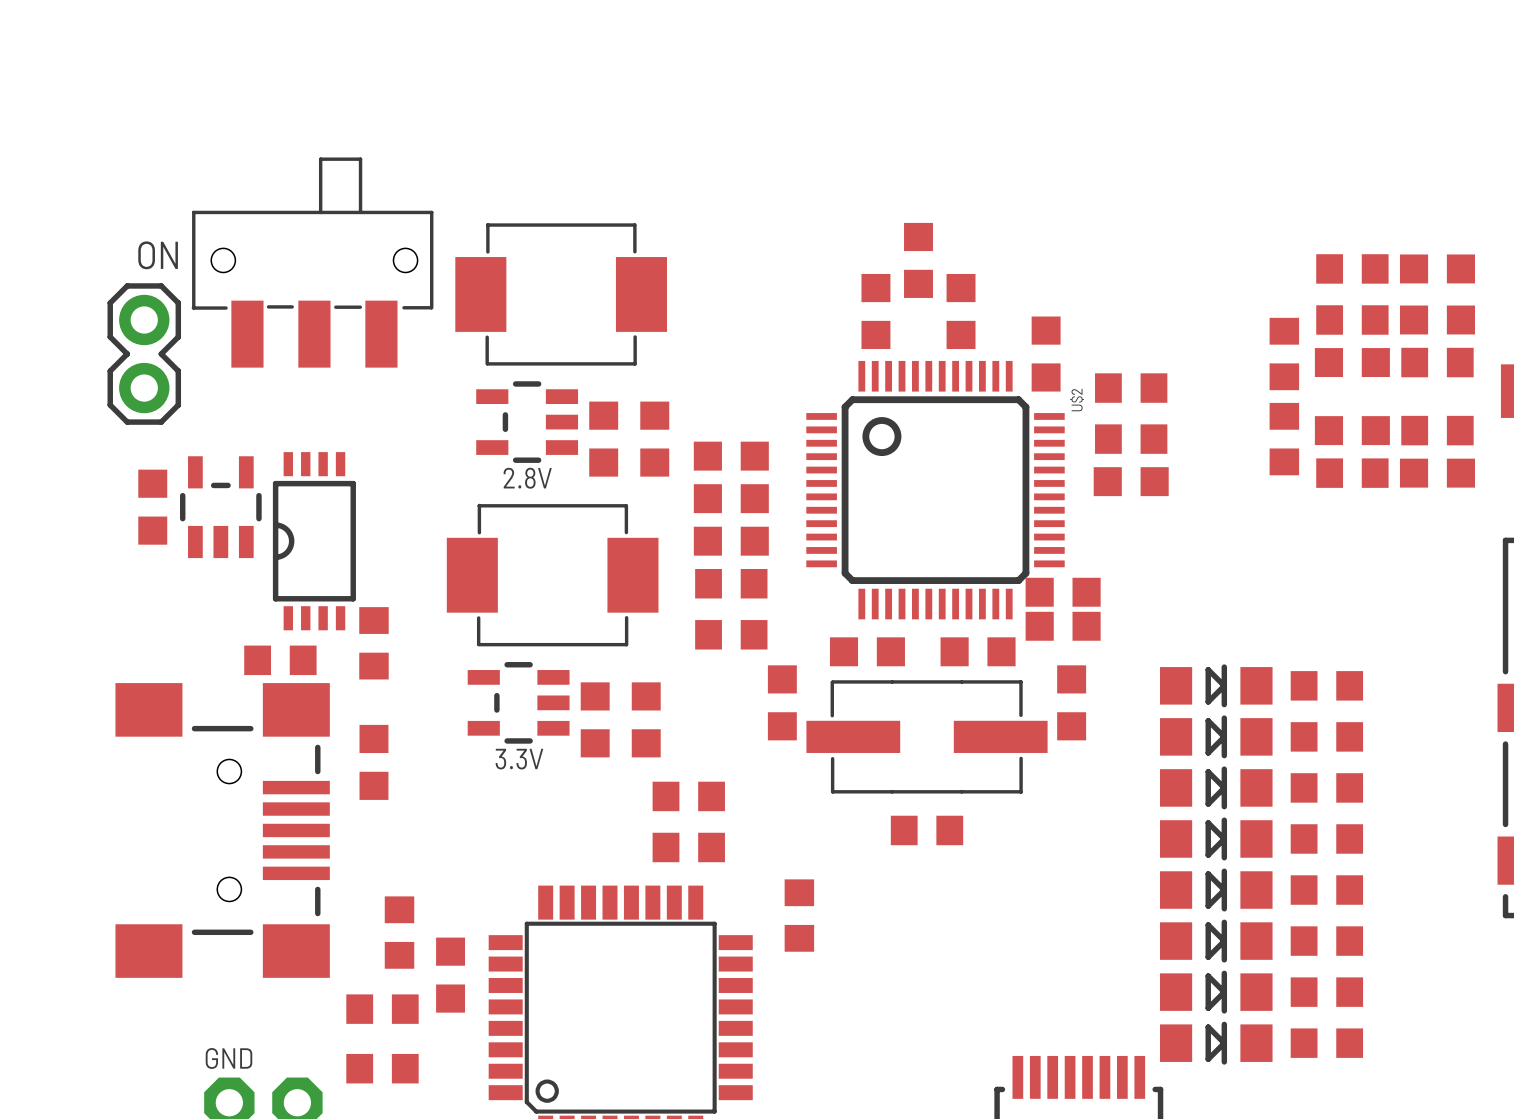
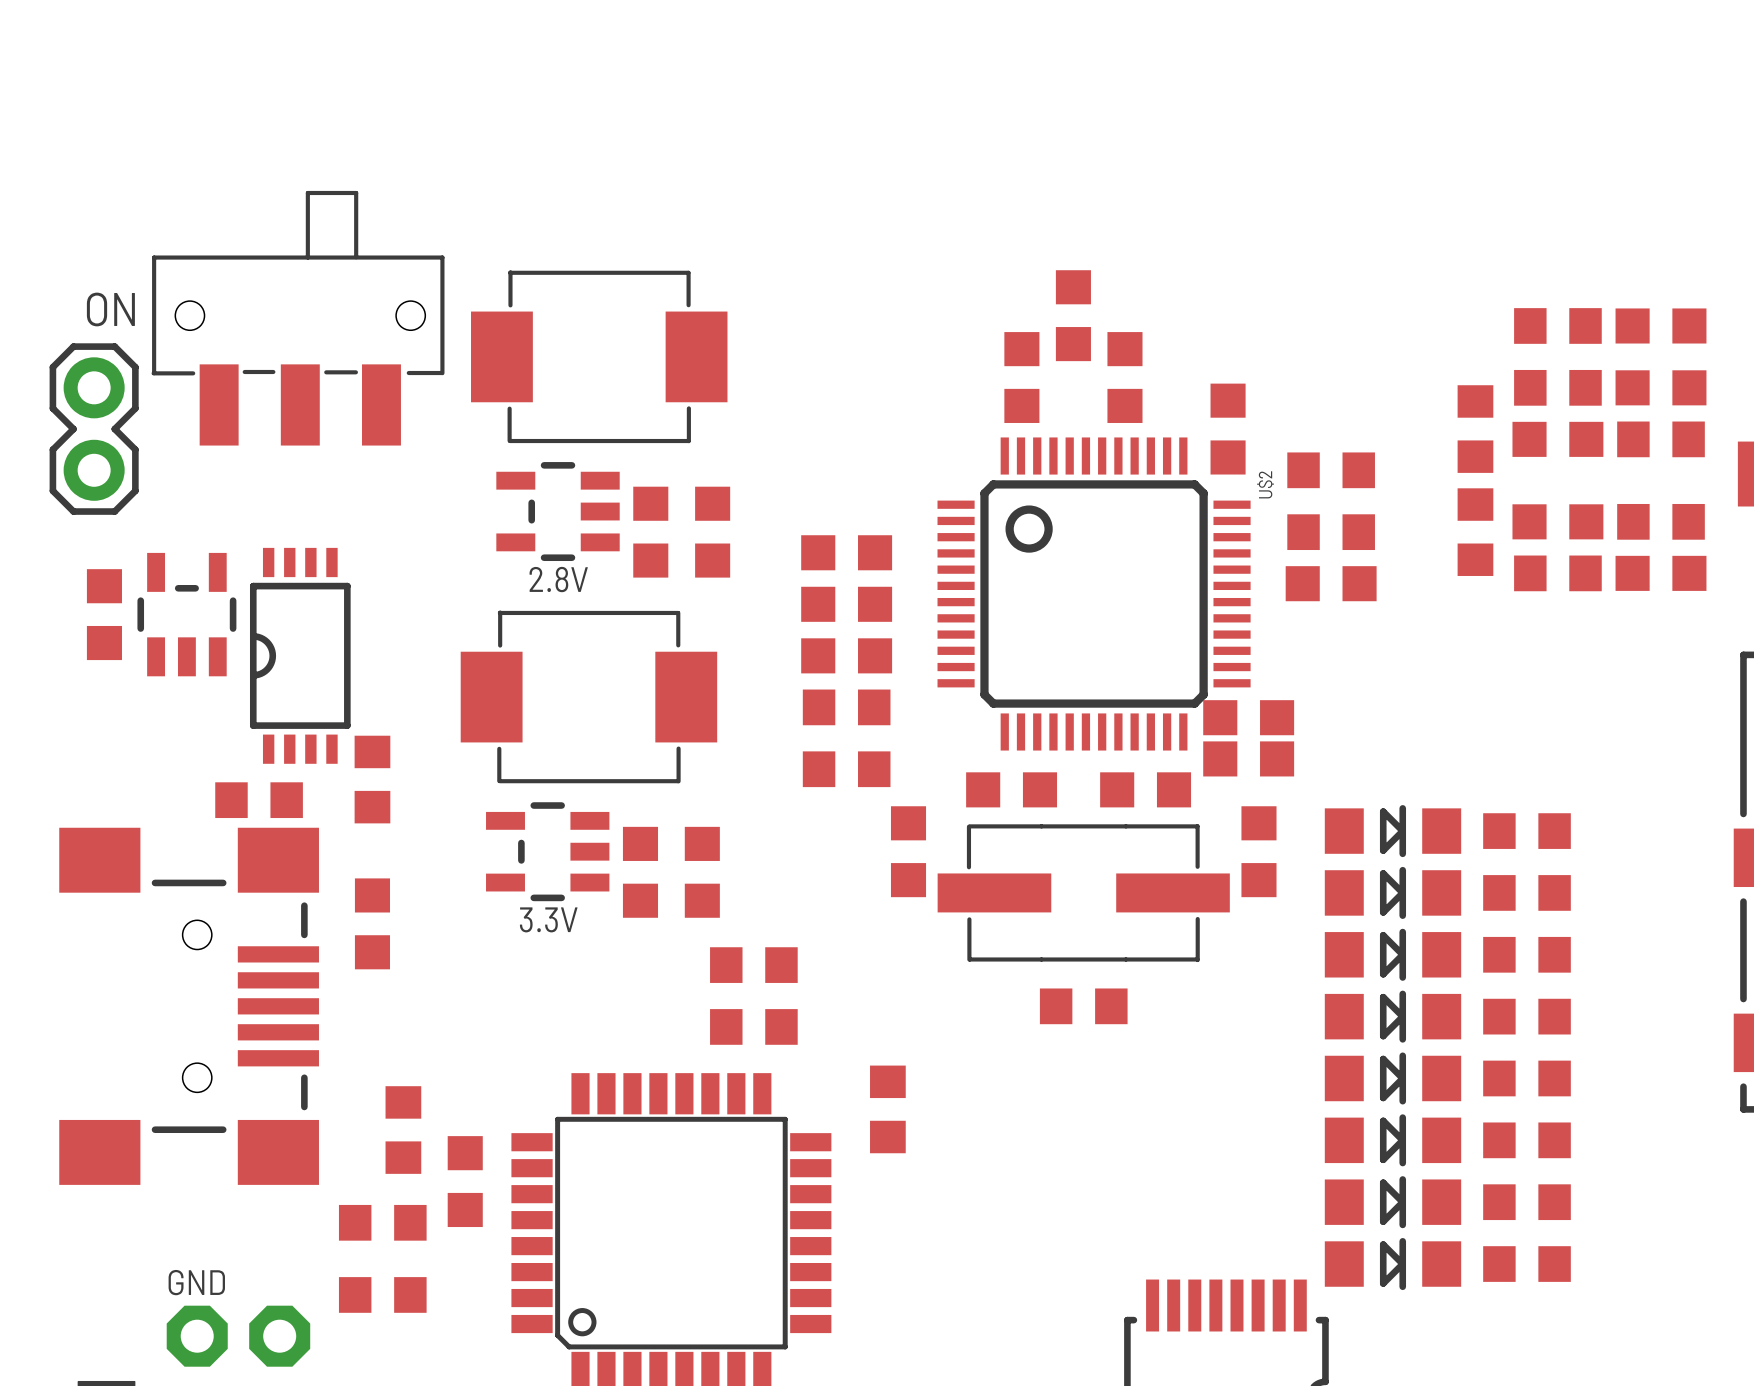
part: (918, 260) -> none
part: none -> (1073, 315)
part: (875, 311) -> none
part: none -> (1021, 377)
part: (961, 311) -> none
part: none -> (1124, 377)
part: (1046, 354) -> none
part: none -> (1228, 429)
part: (1131, 388) -> none
part: none -> (1331, 470)
part: (1131, 439) -> none
part: none -> (1331, 532)
part: (731, 456) -> none
part: none -> (846, 552)
part position: (1131, 481) -> (1331, 583)
U$2 position: (935, 490) -> (1094, 593)
part: (731, 498) -> none
part: none -> (846, 604)
part: (731, 541) -> none
part: none -> (846, 655)
part: (731, 583) -> none
part: none -> (846, 707)
part: (1063, 592) -> none
part: none -> (1248, 717)
part: (1063, 626) -> none
part: none -> (1248, 758)
part: (731, 634) -> none
part: none -> (846, 769)
part position: (867, 651) -> (1011, 789)
part: (978, 651) -> none
part: none -> (1145, 789)
part position: (782, 702) -> (908, 851)
part position: (1071, 702) -> (1258, 851)
part position: (927, 737) -> (1083, 893)
part position: (927, 830) -> (1083, 1006)

